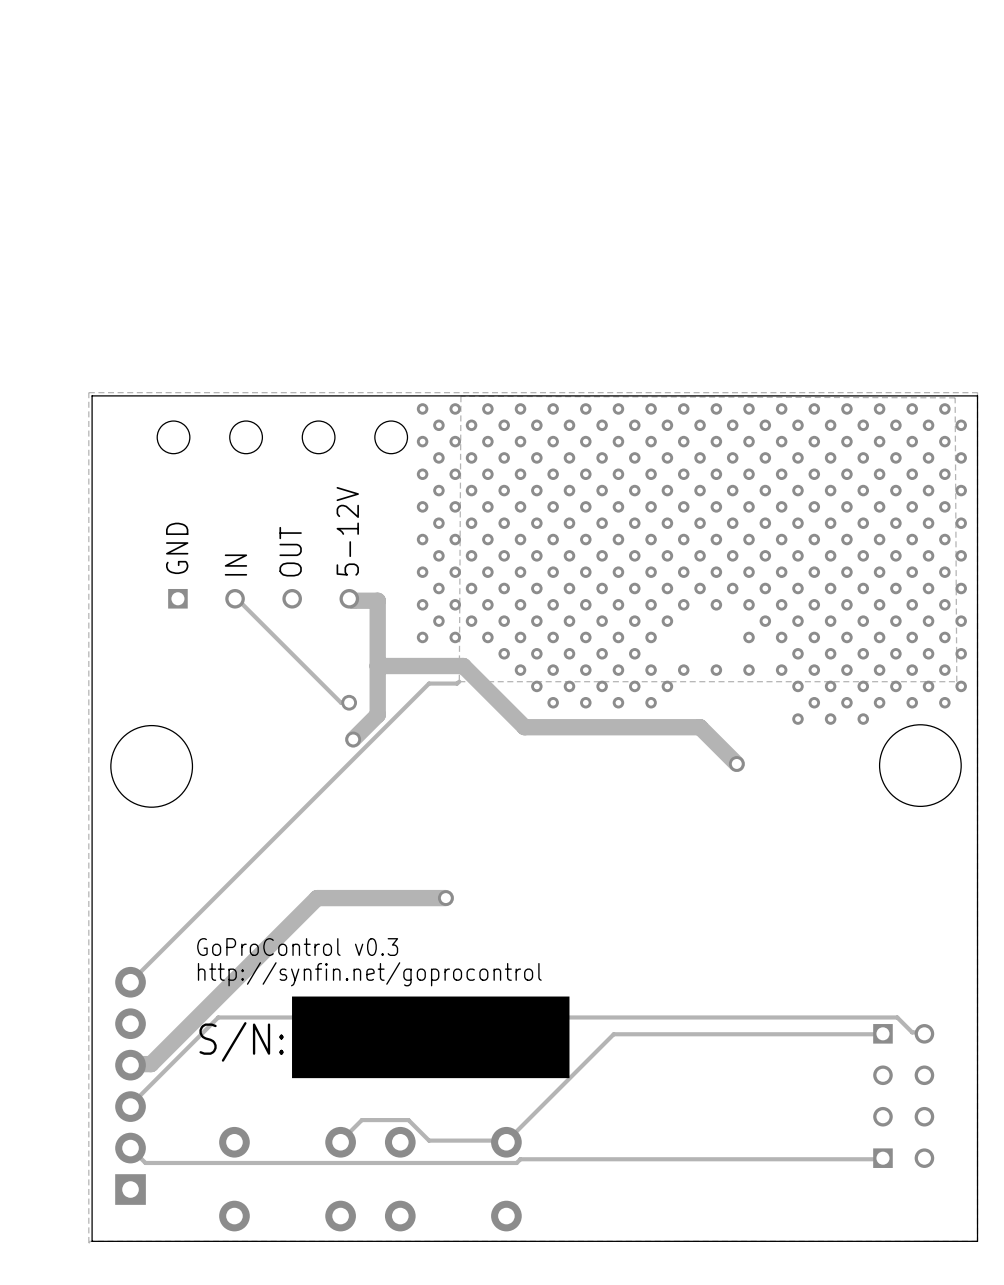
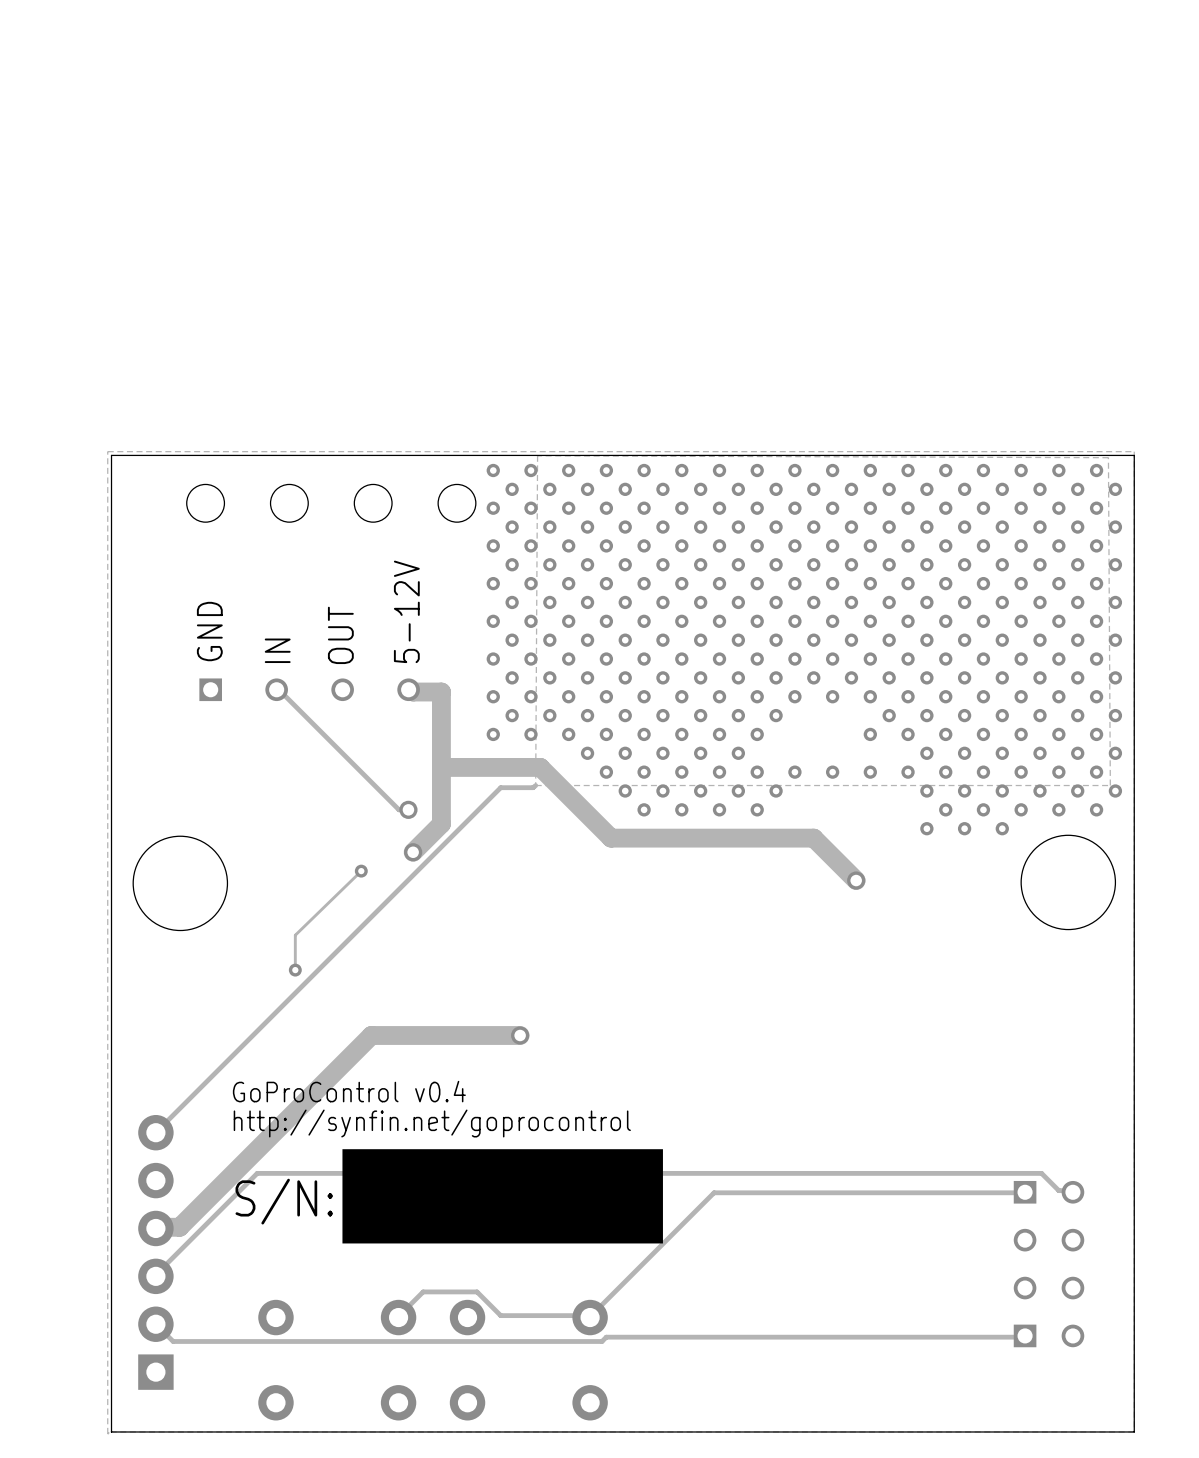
track: none -> (361, 871) (295, 935) (295, 970)
via: none -> (361, 871)
via: none -> (295, 970)
text: GoProControl v0.3 (297, 947) -> GoProControl v0.4 (349, 1091)

